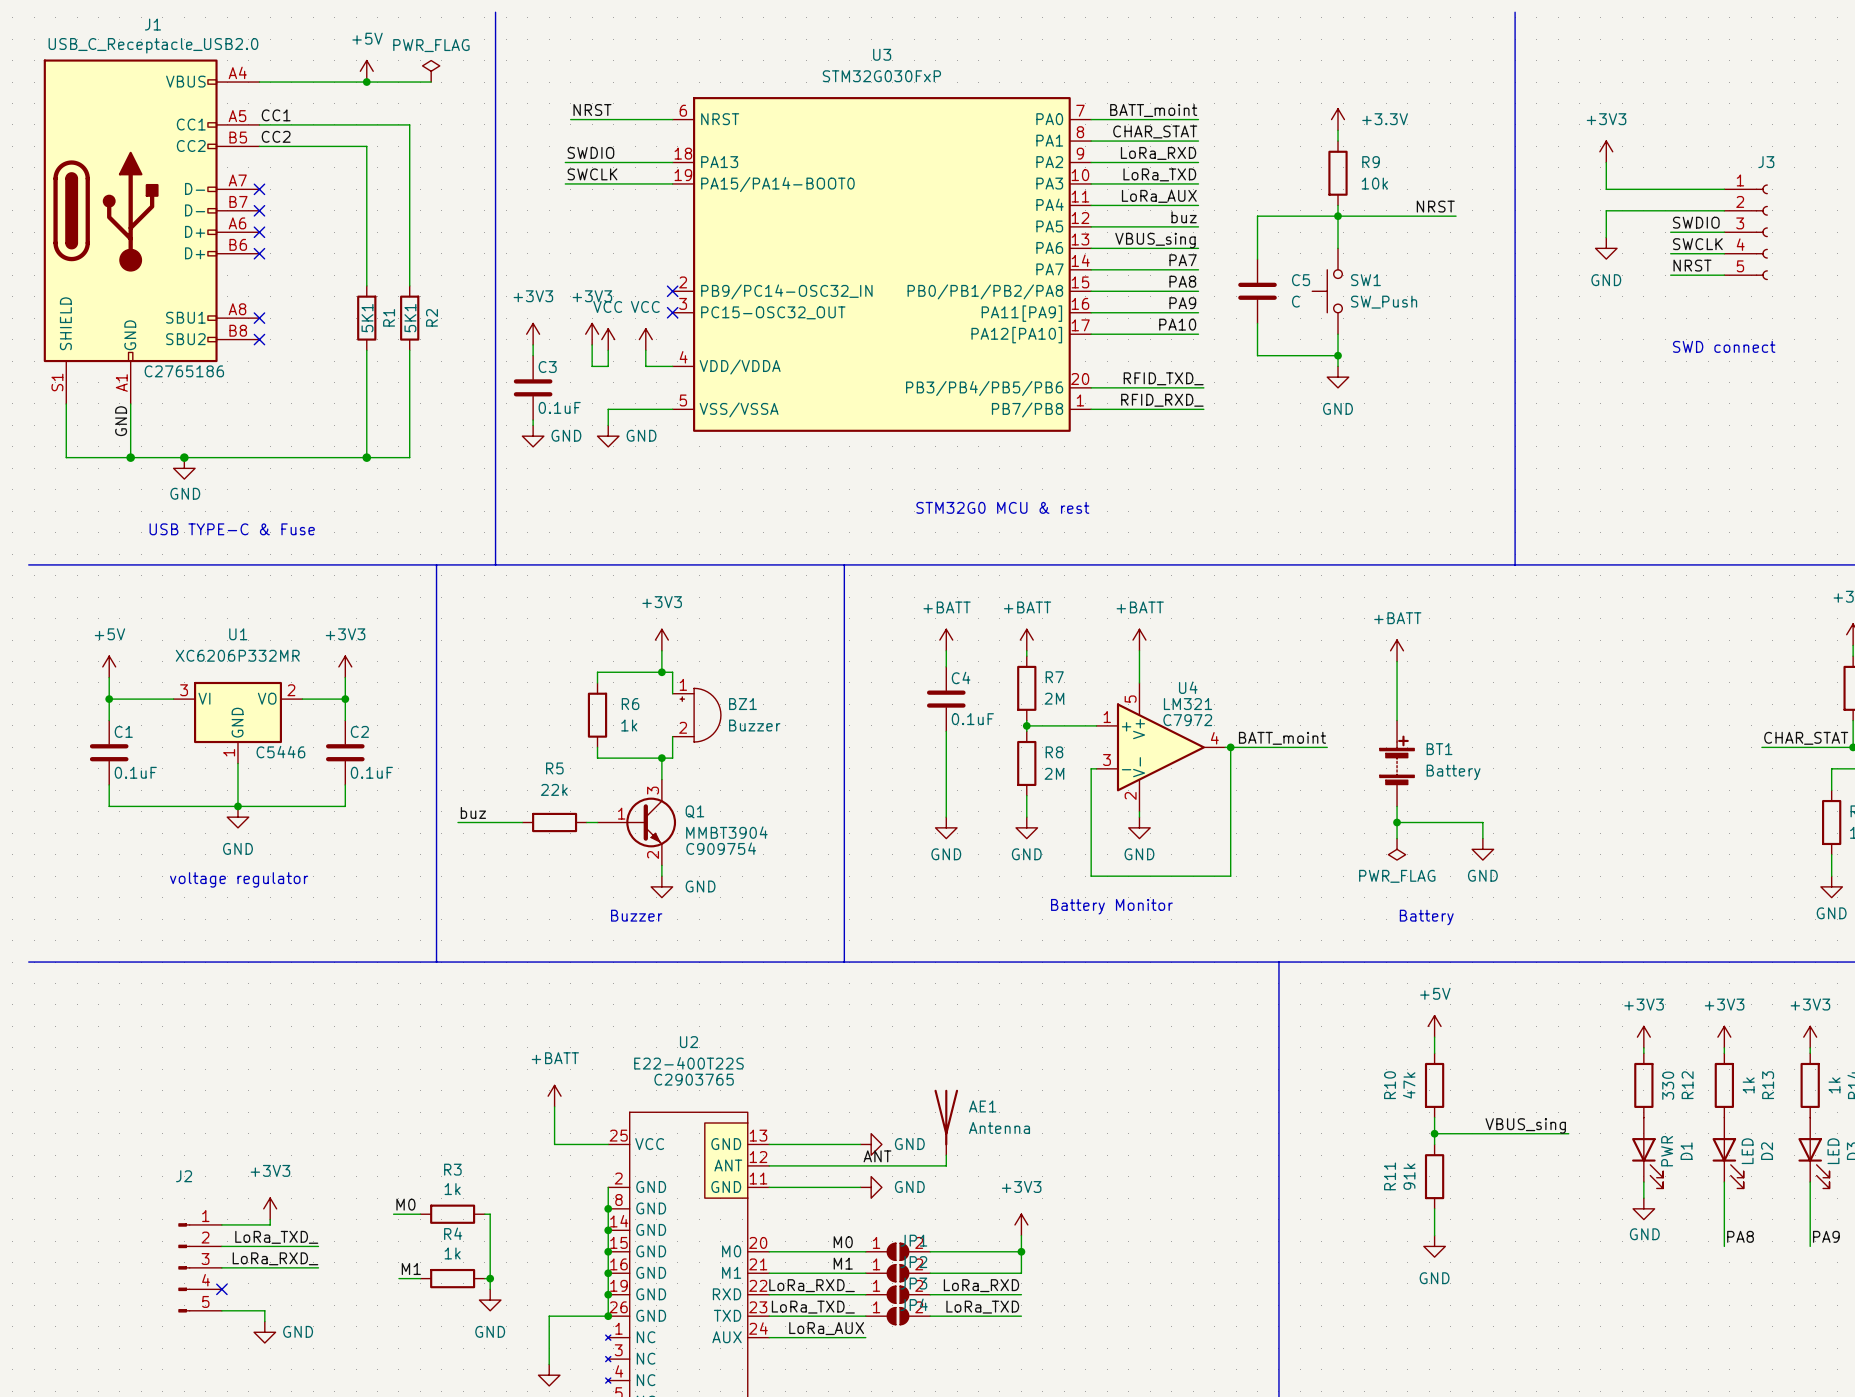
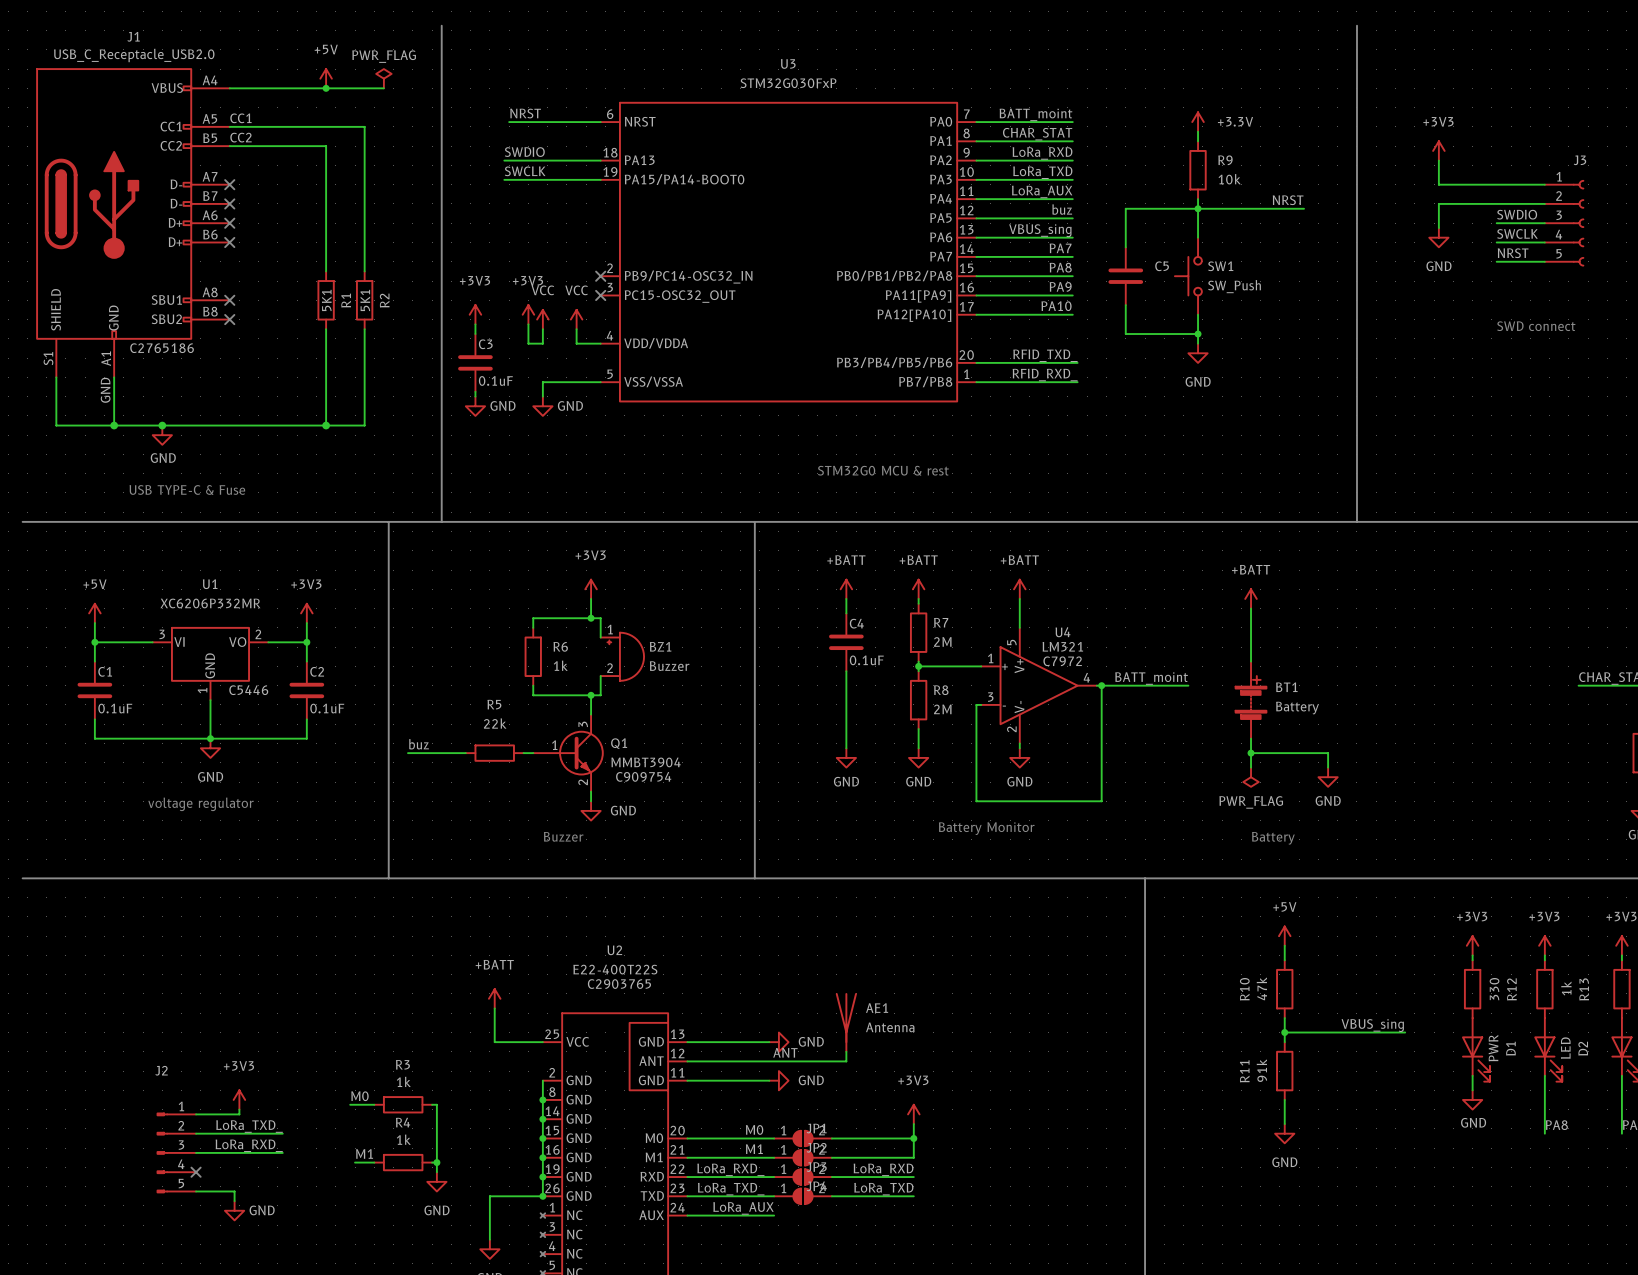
C5 value: C (1295, 301) -> none

